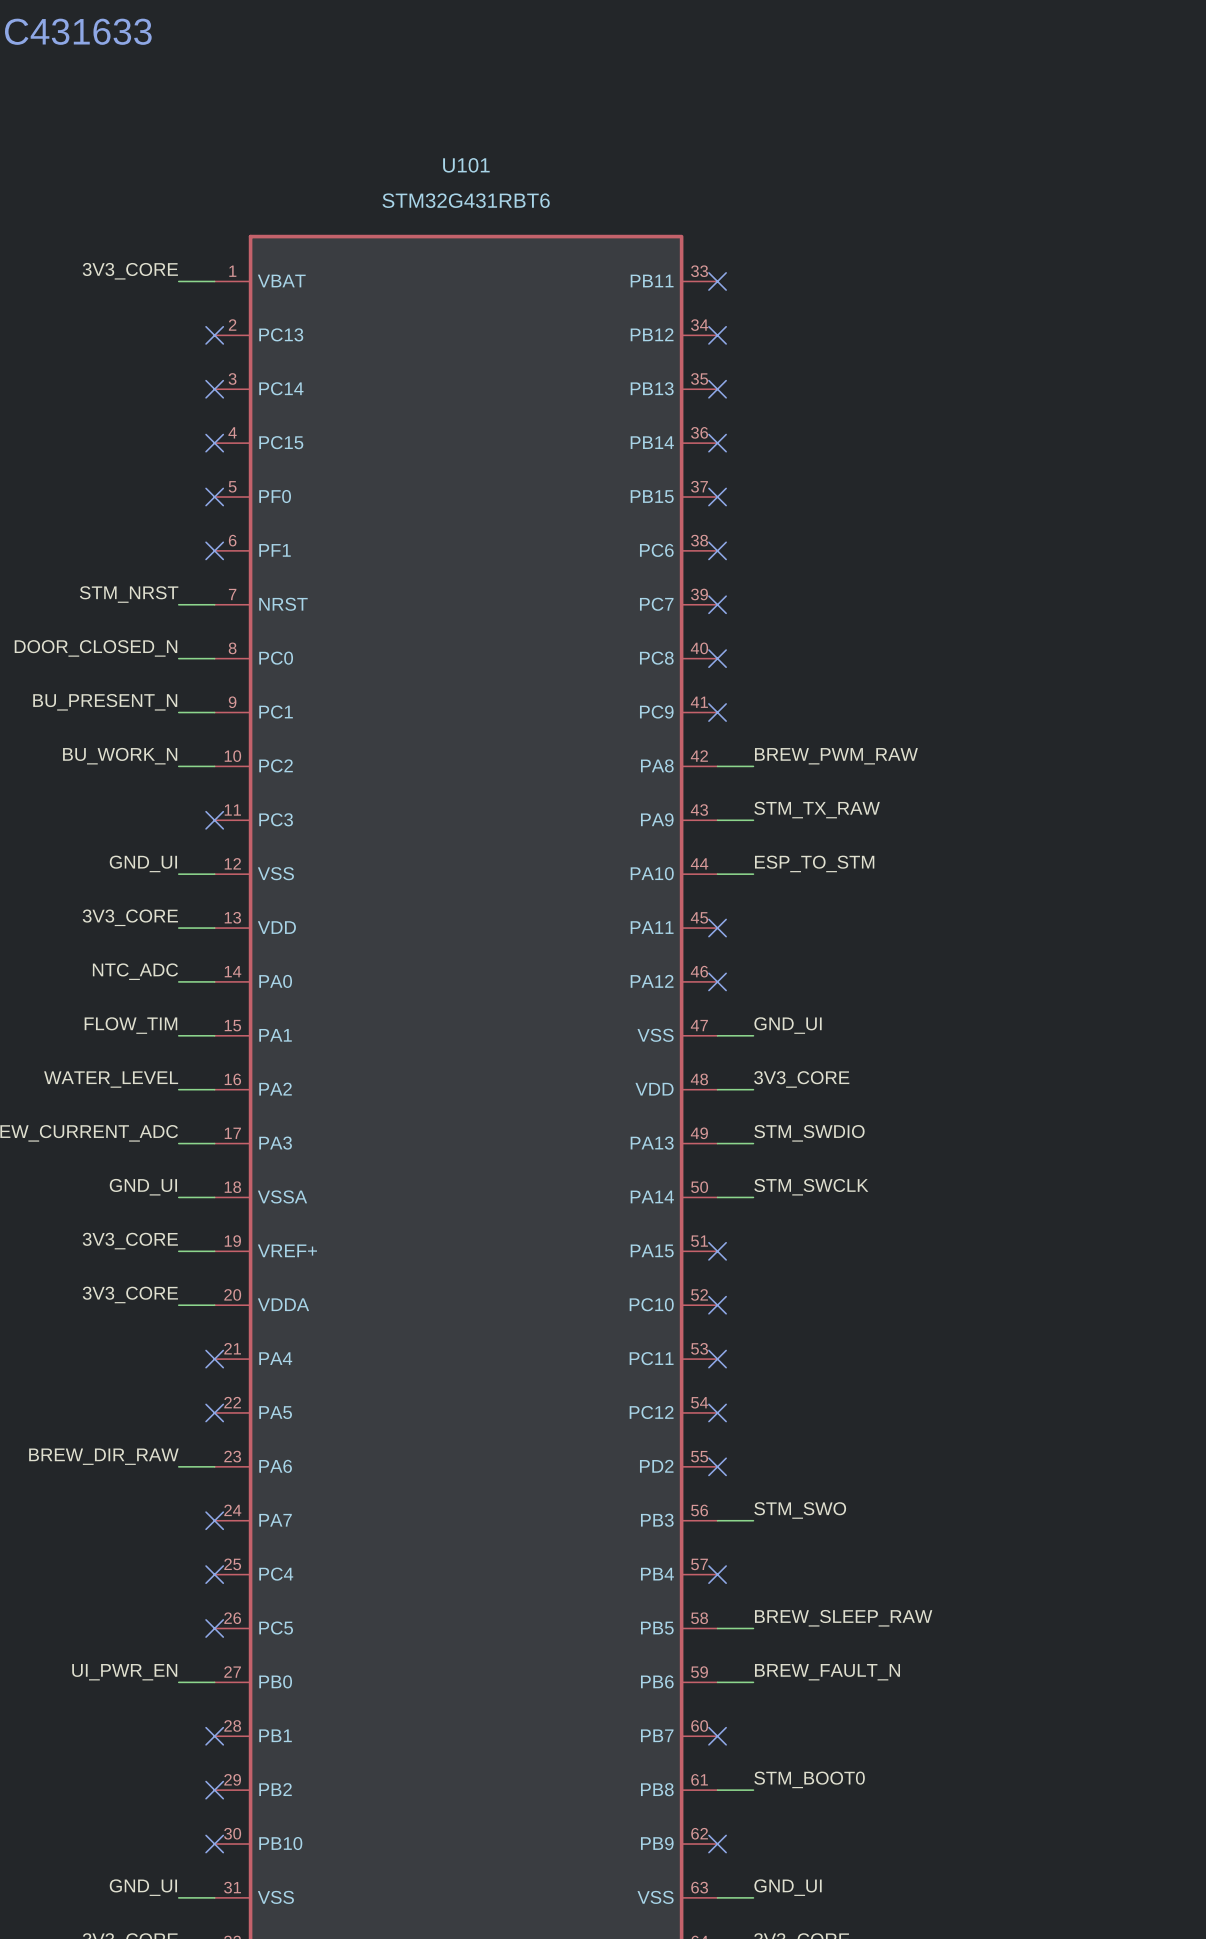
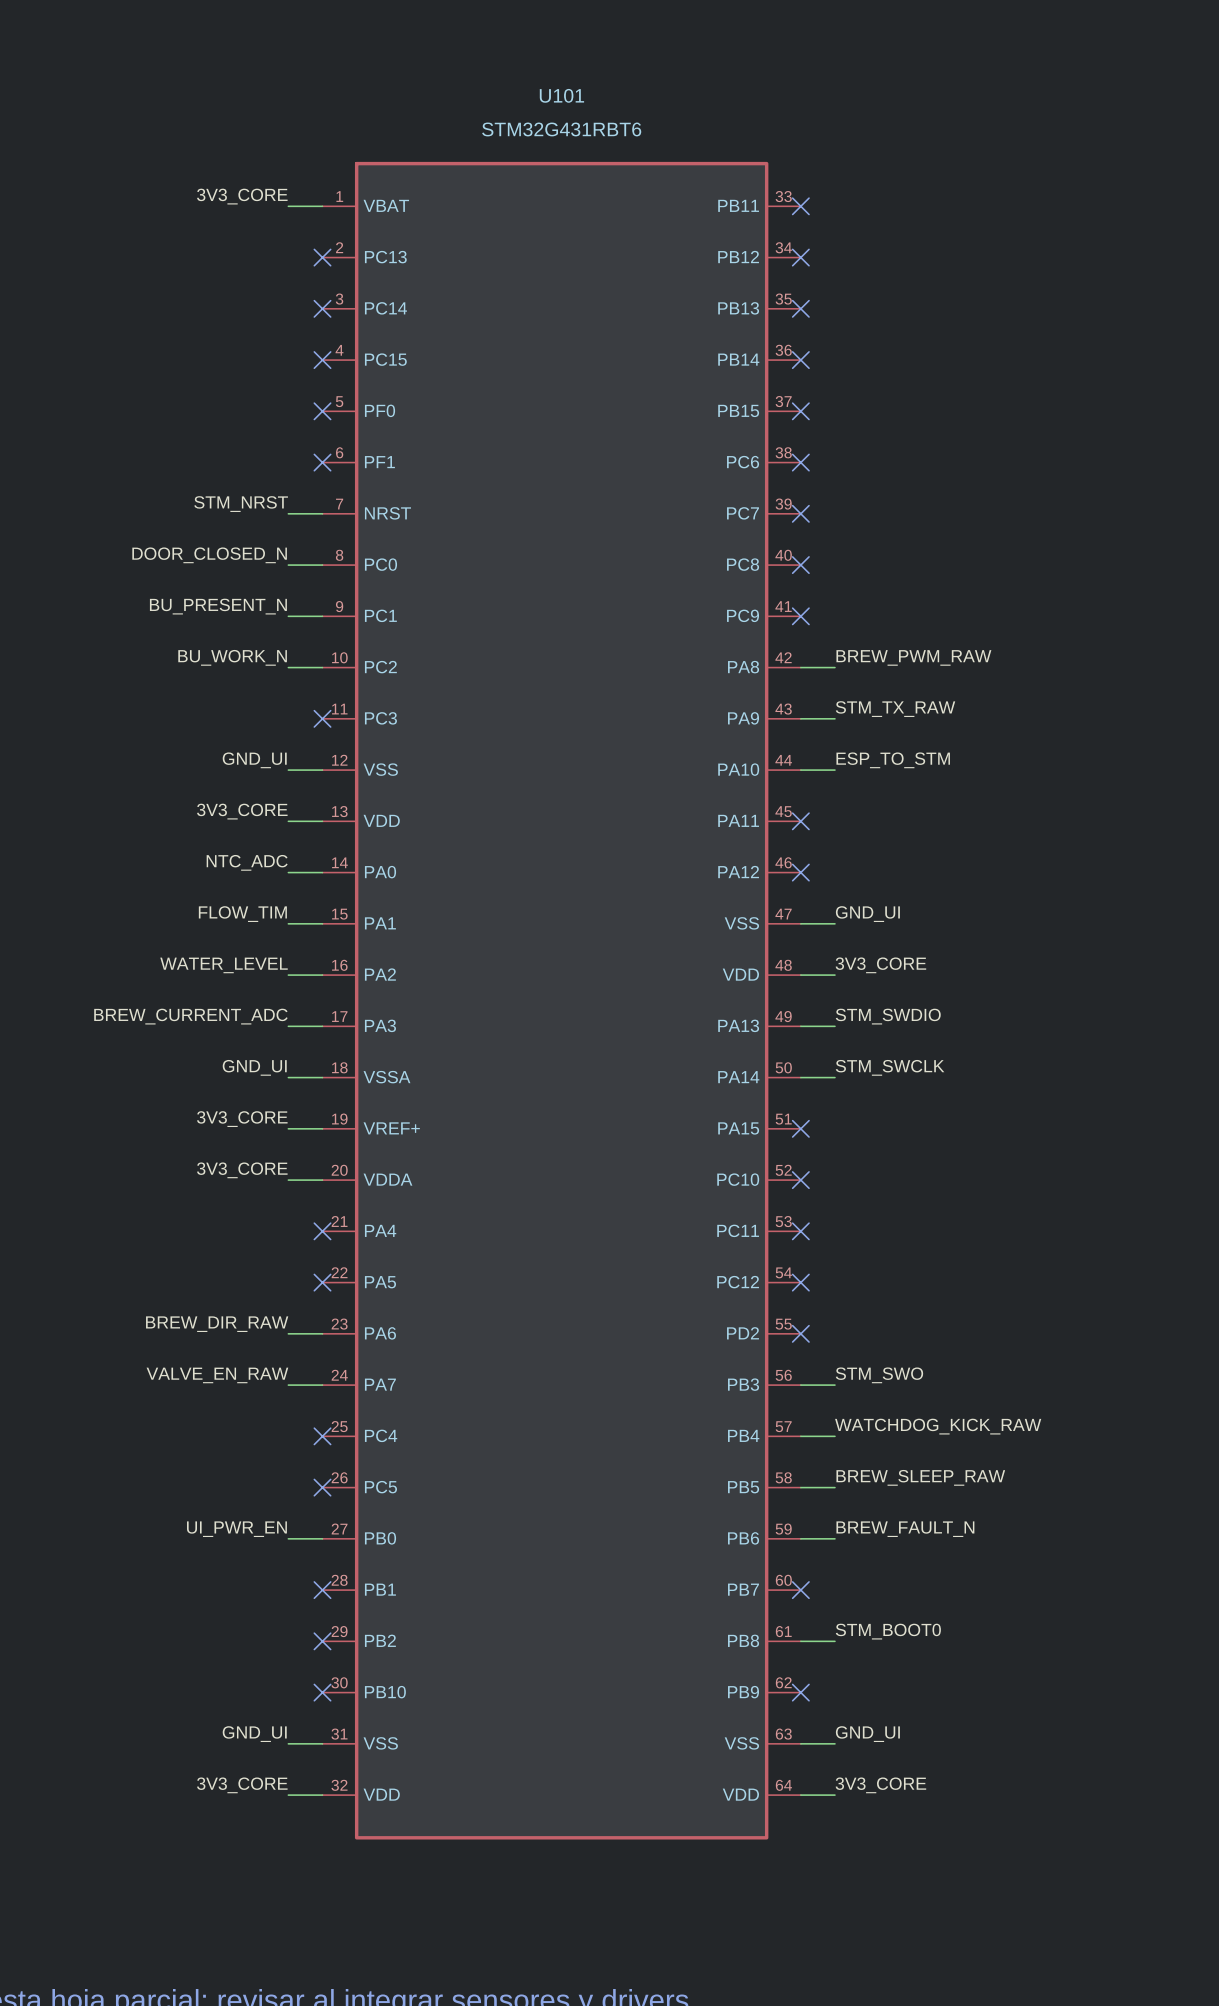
label: none -> VALVE_EN_RAW (217, 1375)
wire: none -> (288, 1385) (322, 1385)
no-connect mark: (214, 1520) -> none
label: none -> WATCHDOG_KICK_RAW (938, 1426)
wire: none -> (800, 1436) (835, 1436)
no-connect mark: (717, 1574) -> none

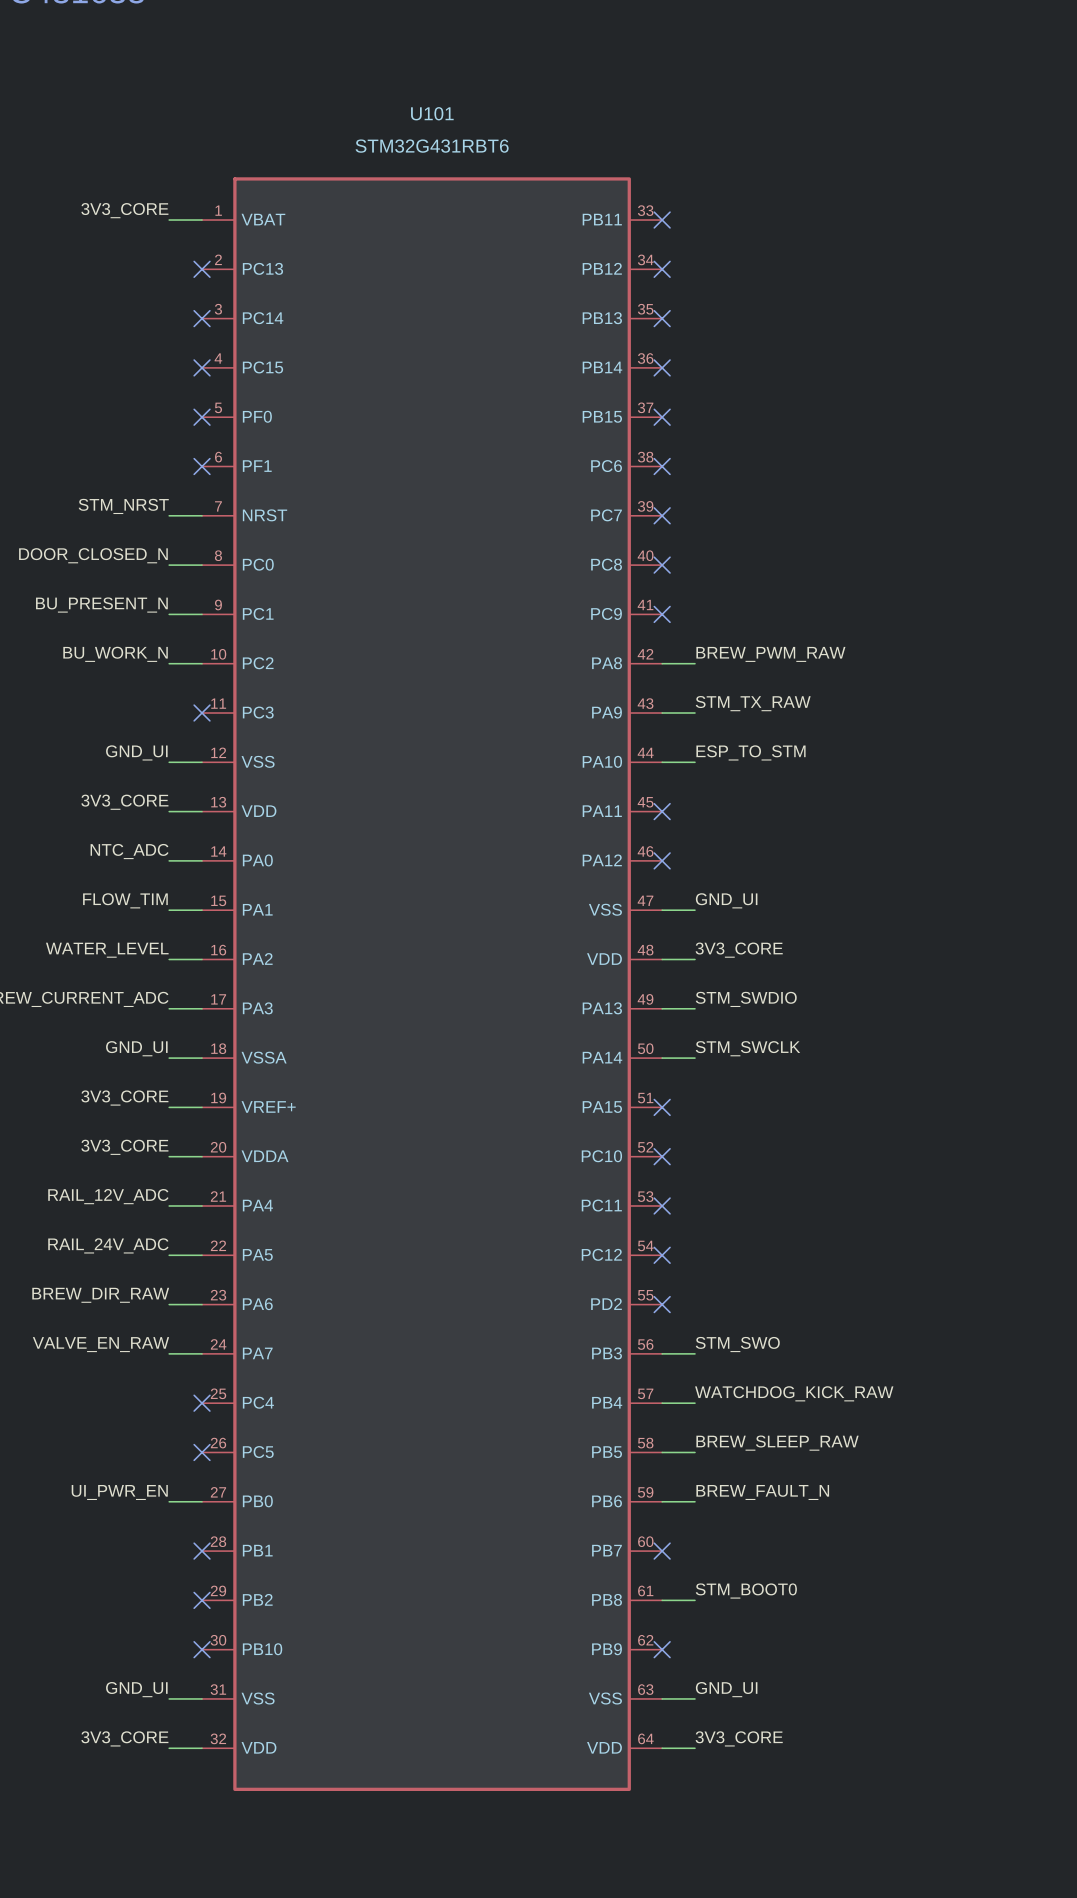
label: none -> RAIL_12V_ADC (108, 1196)
wire: none -> (169, 1205) (202, 1205)
no-connect mark: (322, 1231) -> none
label: none -> RAIL_24V_ADC (108, 1245)
wire: none -> (169, 1255) (202, 1255)
no-connect mark: (322, 1282) -> none

